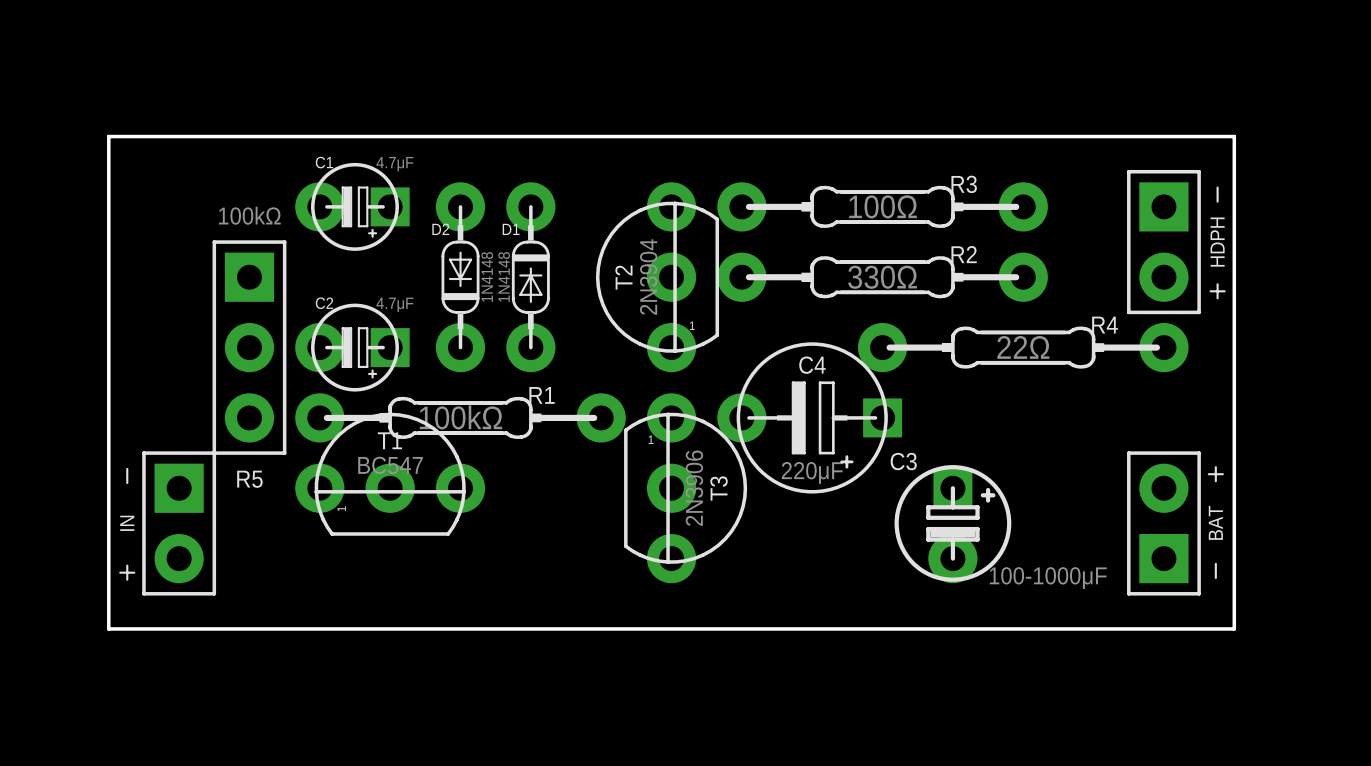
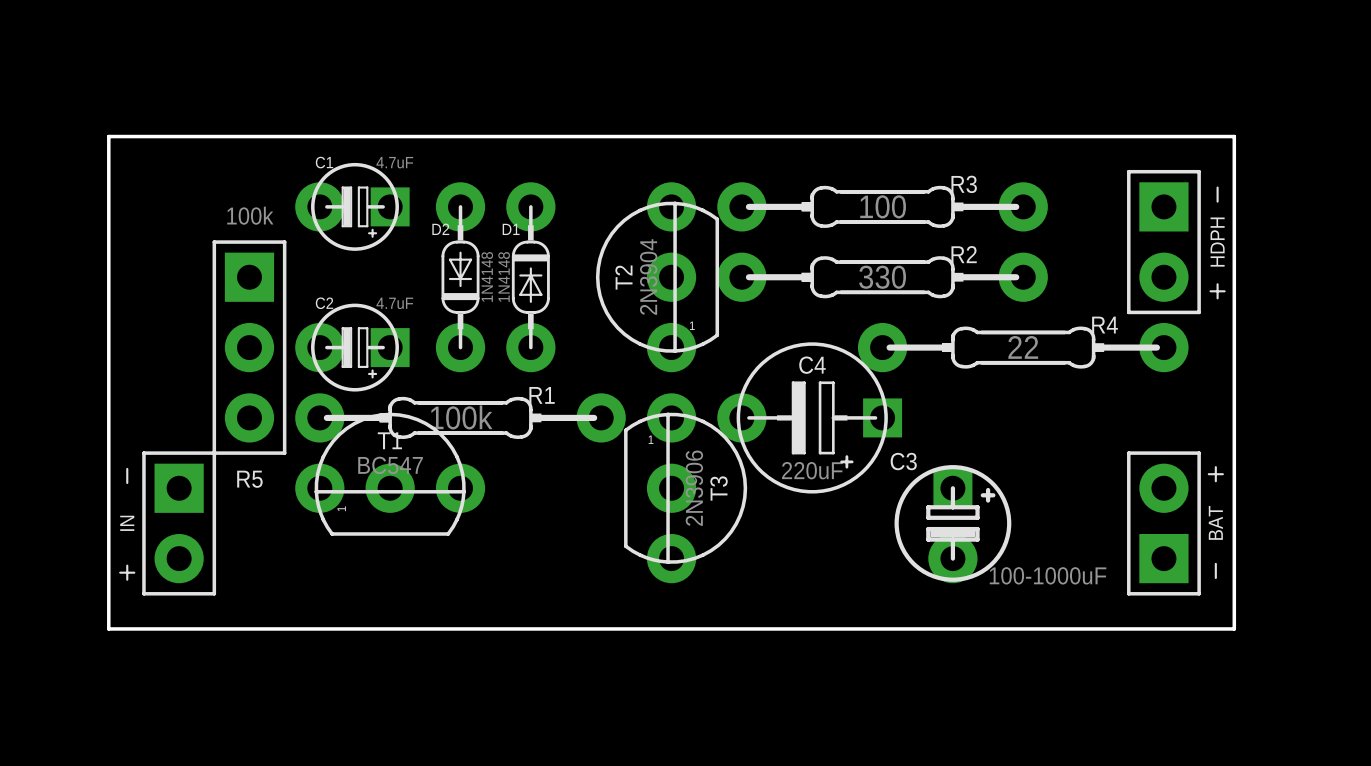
C1 value: 4.7μF (394, 164) -> 4.7uF (394, 162)
R3 value: 100Ω (883, 206) -> 100 (883, 206)
R5 value: 100kΩ (249, 215) -> 100k (250, 215)
R2 value: 330Ω (882, 277) -> 330 (882, 277)
C2 value: 4.7μF (394, 304) -> 4.7uF (394, 303)
R4 value: 22Ω (1023, 347) -> 22 (1023, 347)
R1 value: 100kΩ (461, 417) -> 100k (461, 417)
C4 value: 220μF (812, 472) -> 220uF (812, 470)
C3 value: 100-1000μF (1048, 578) -> 100-1000uF (1048, 575)

